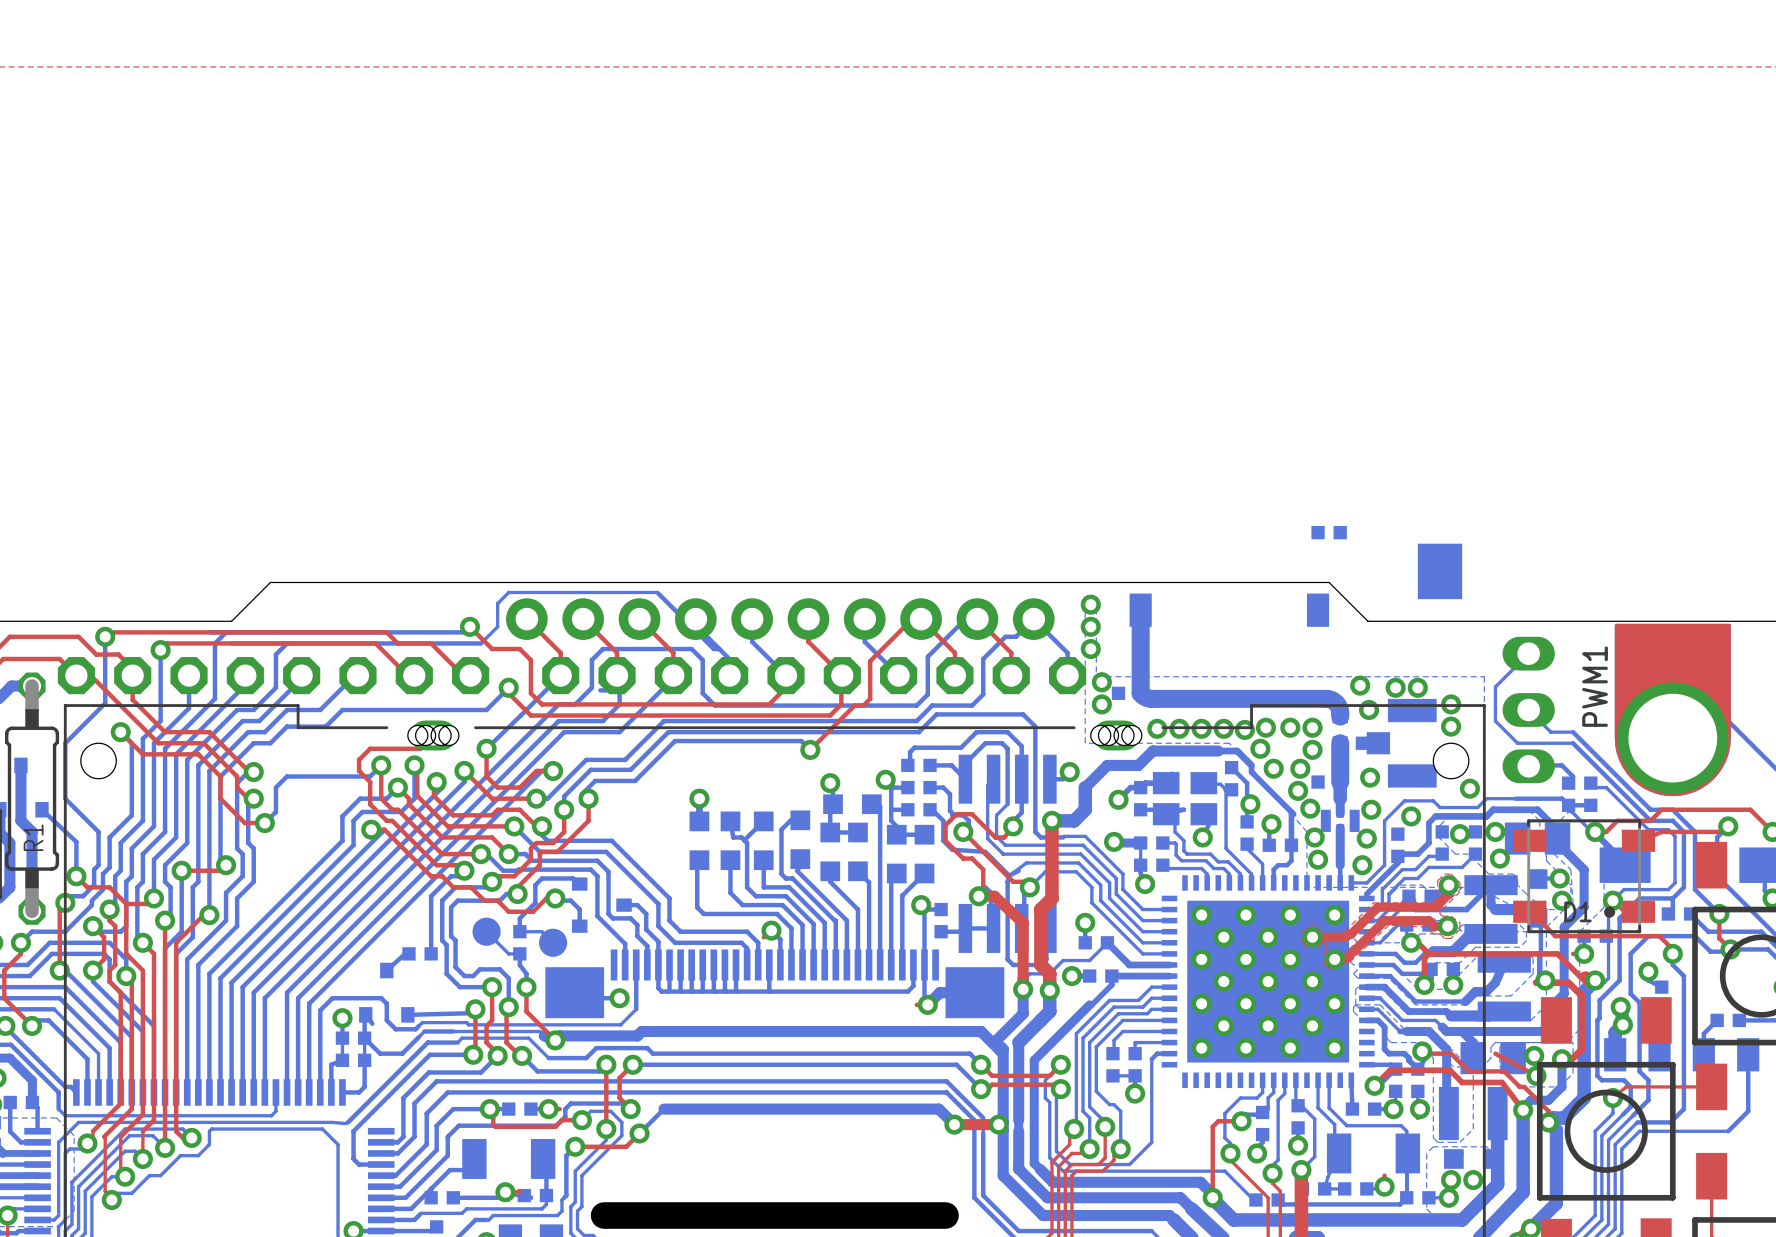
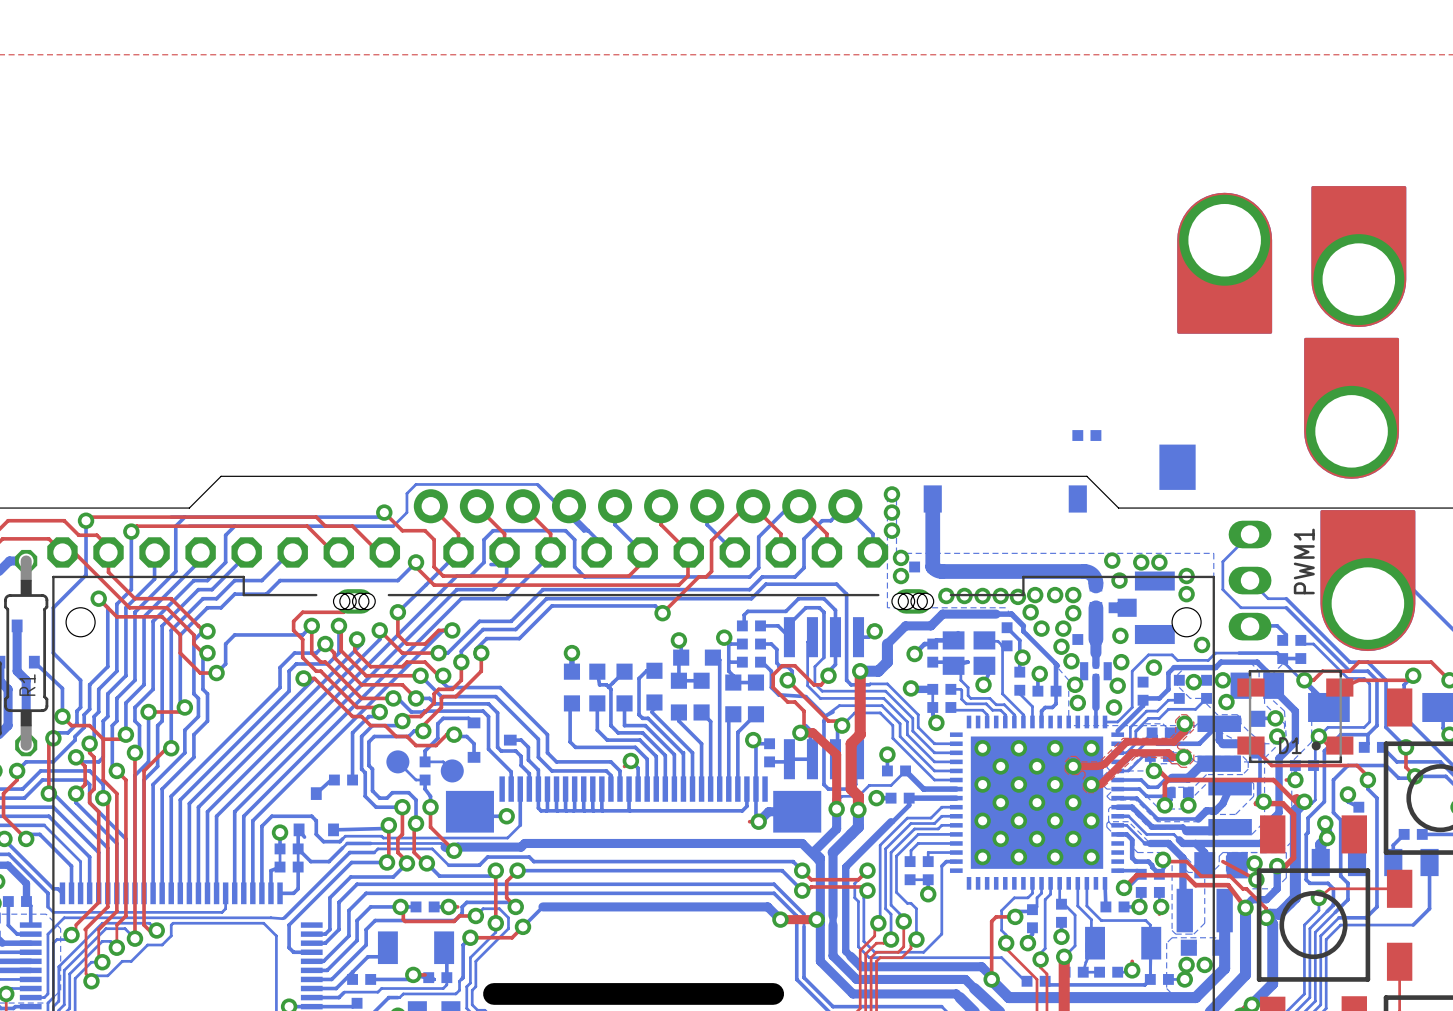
part: none -> (1358, 256)
part: none -> (1224, 263)
part: none -> (1351, 408)

